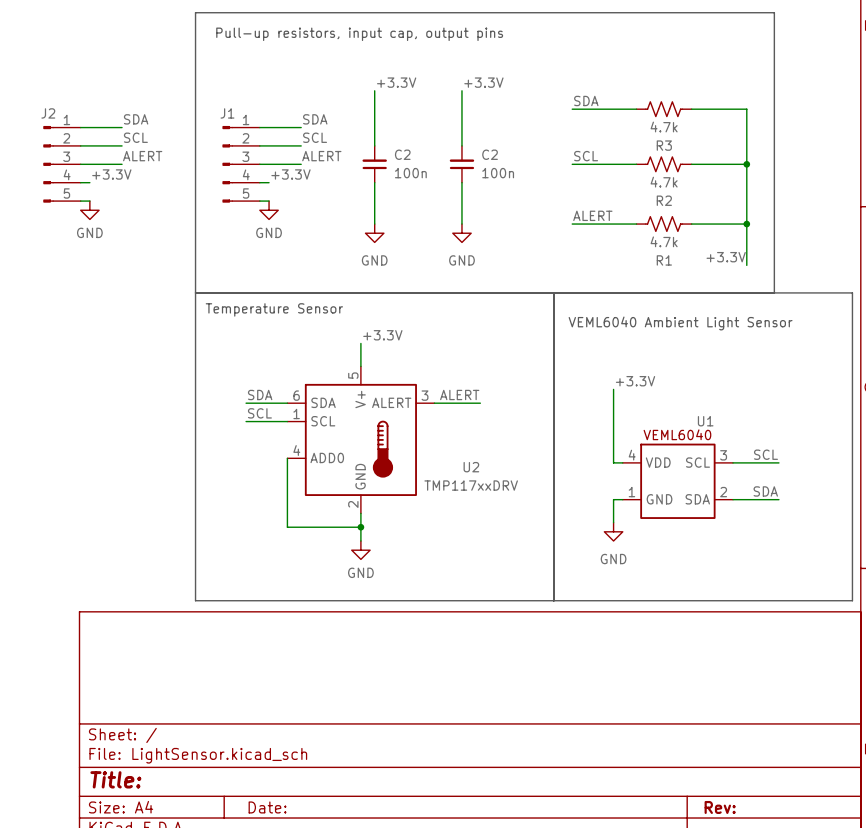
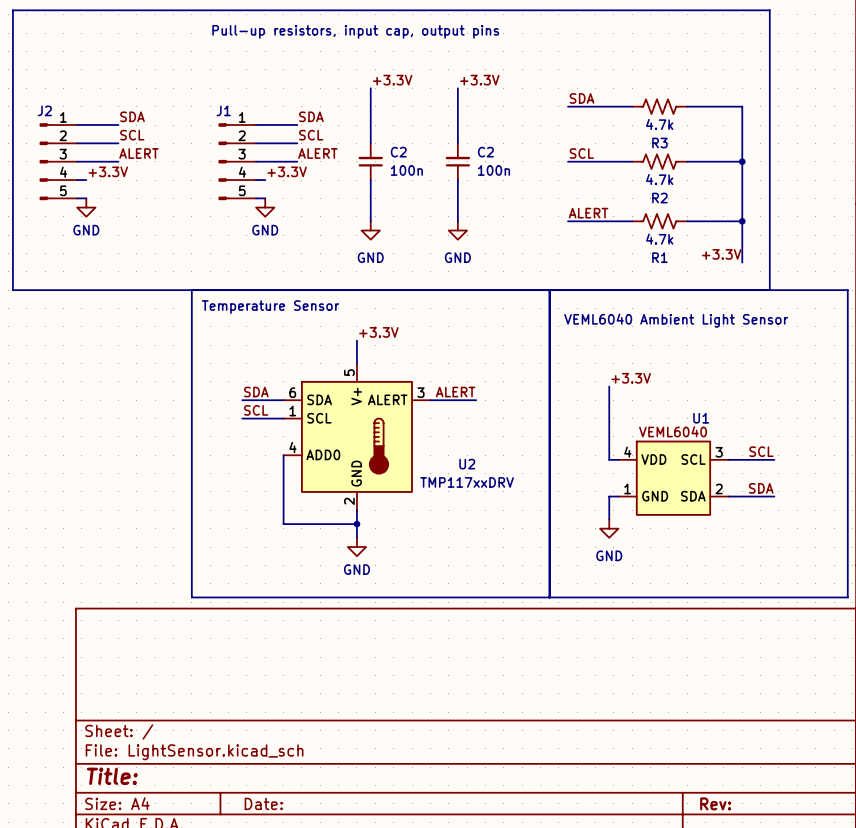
line: (195, 12) (195, 292) -> (191, 10) (12, 10) (12, 290) (191, 290)

